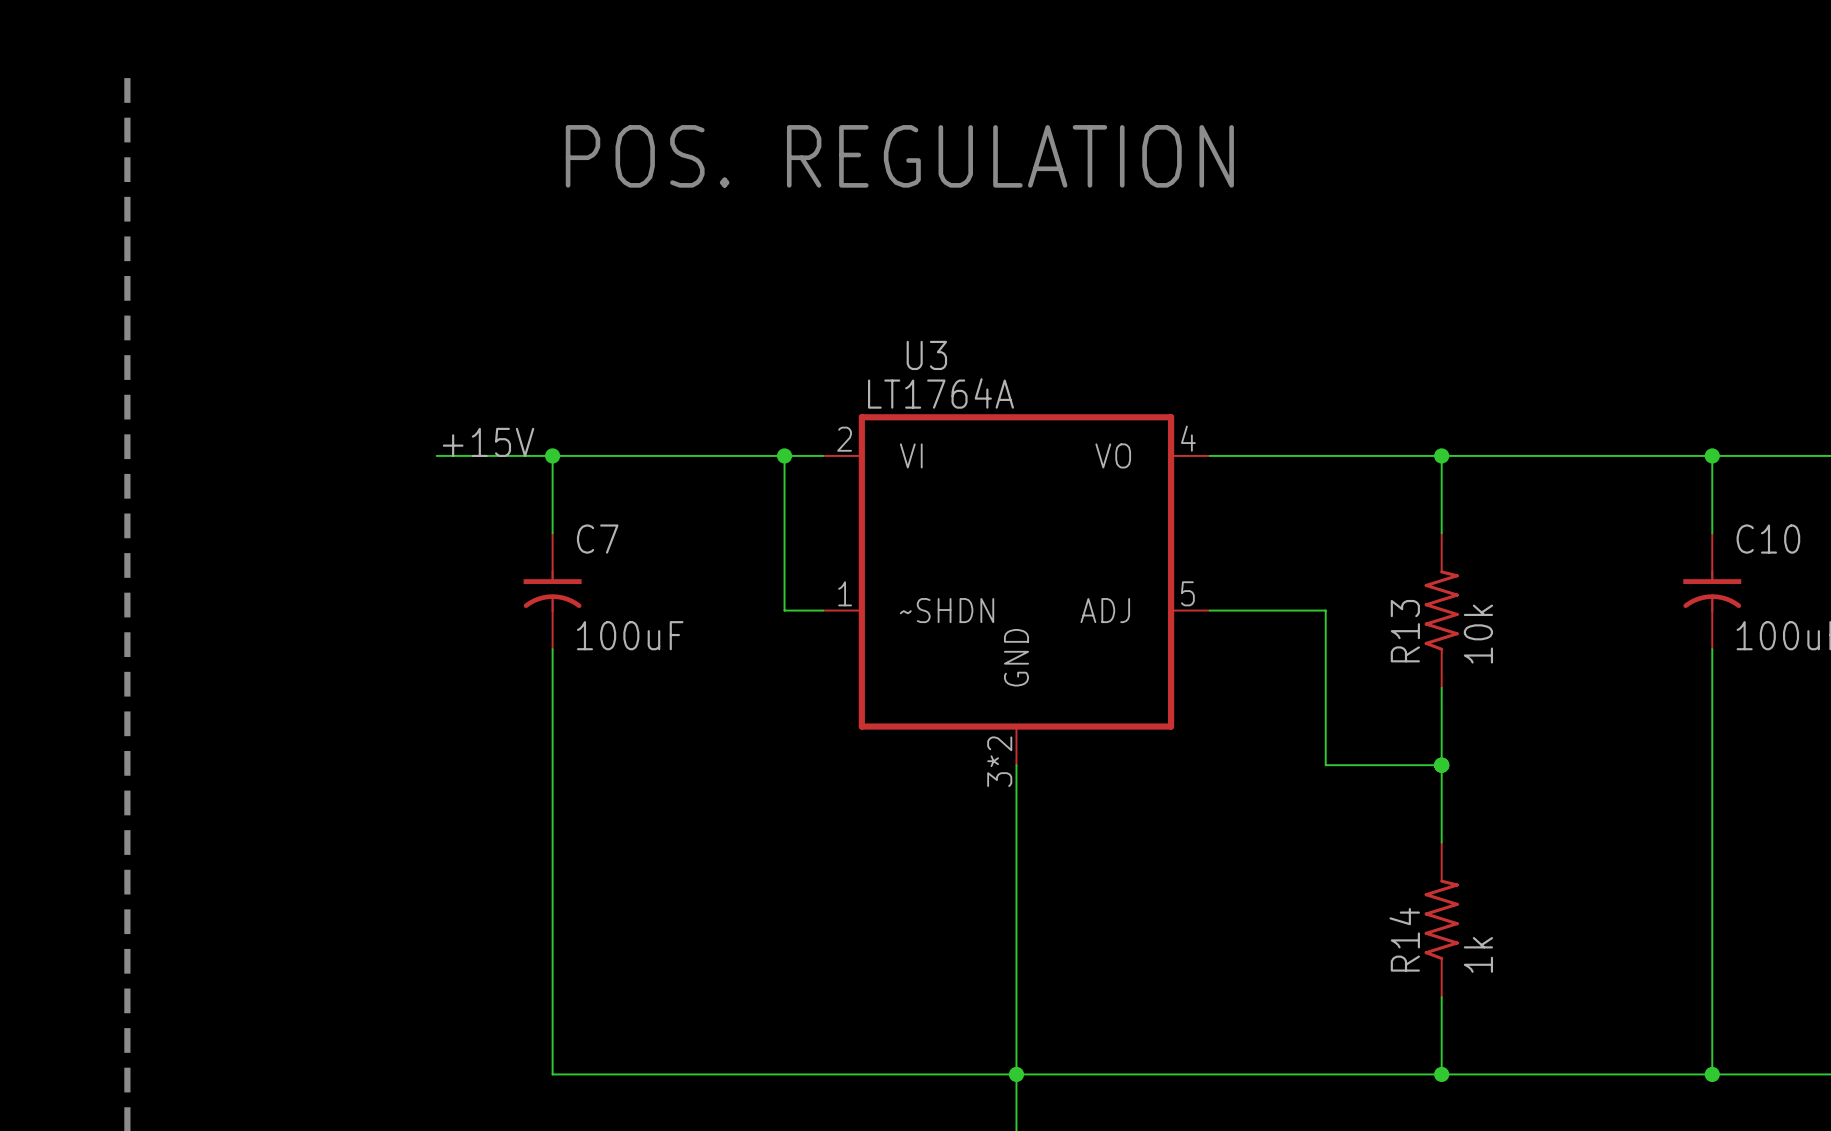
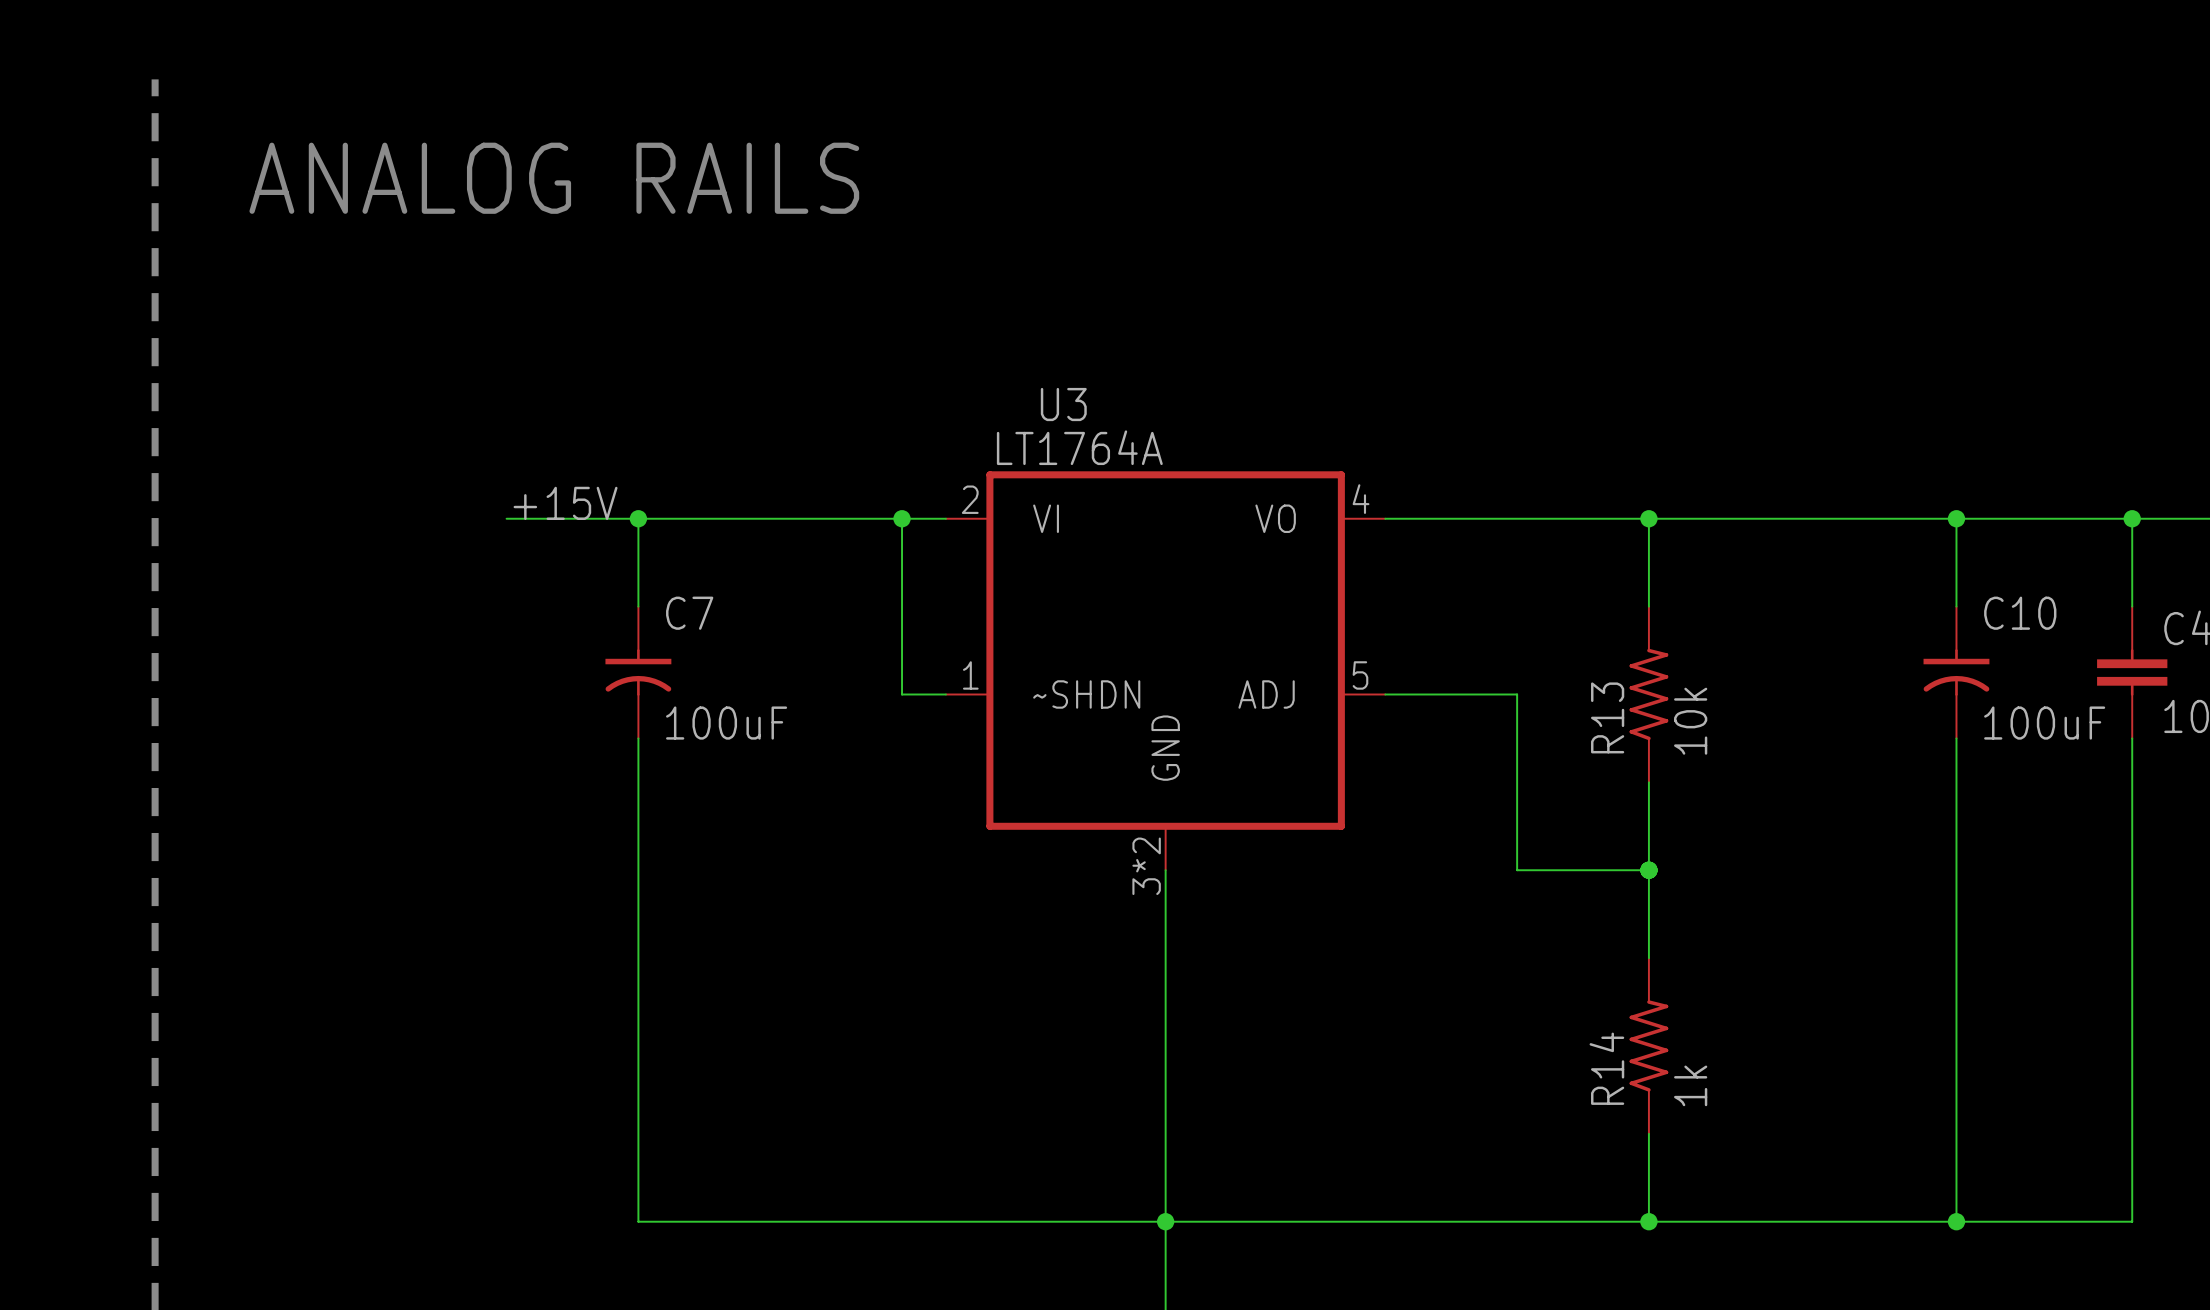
text: none -> ANALOG RAILS (554, 178)
text: POS. REGULATION (899, 156) -> none

